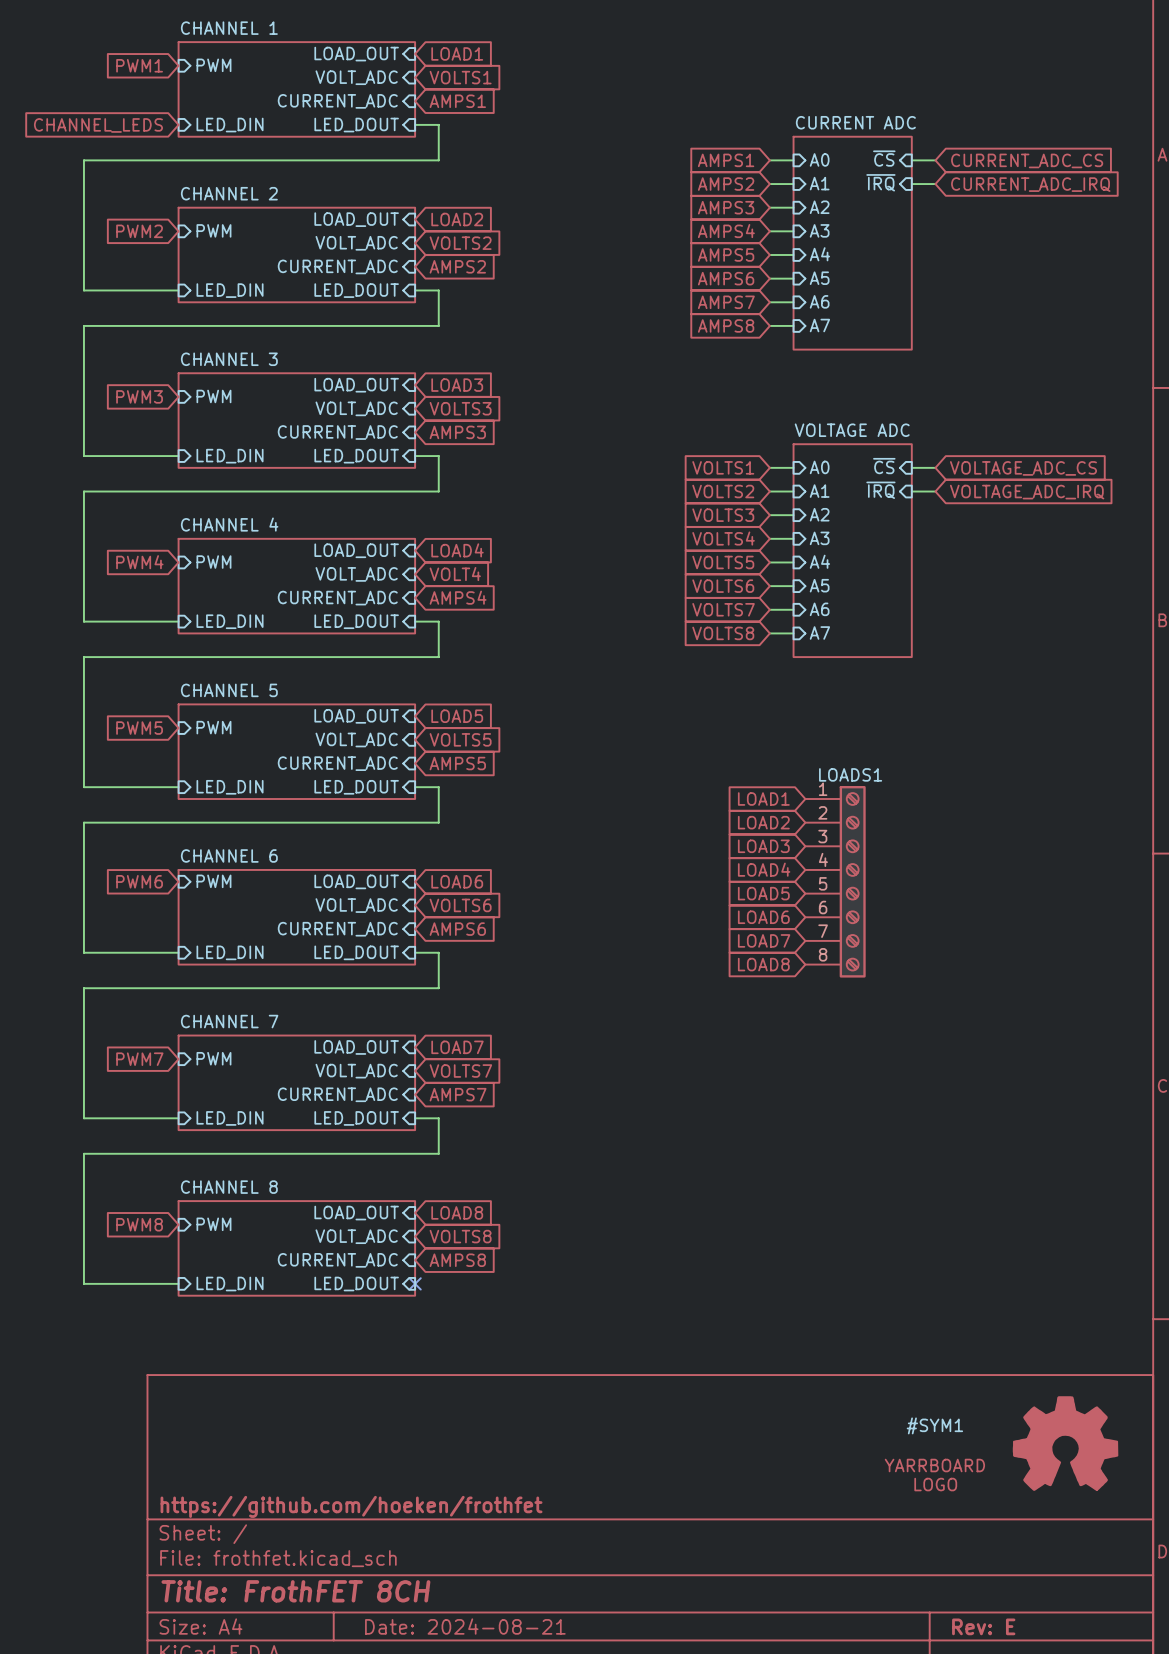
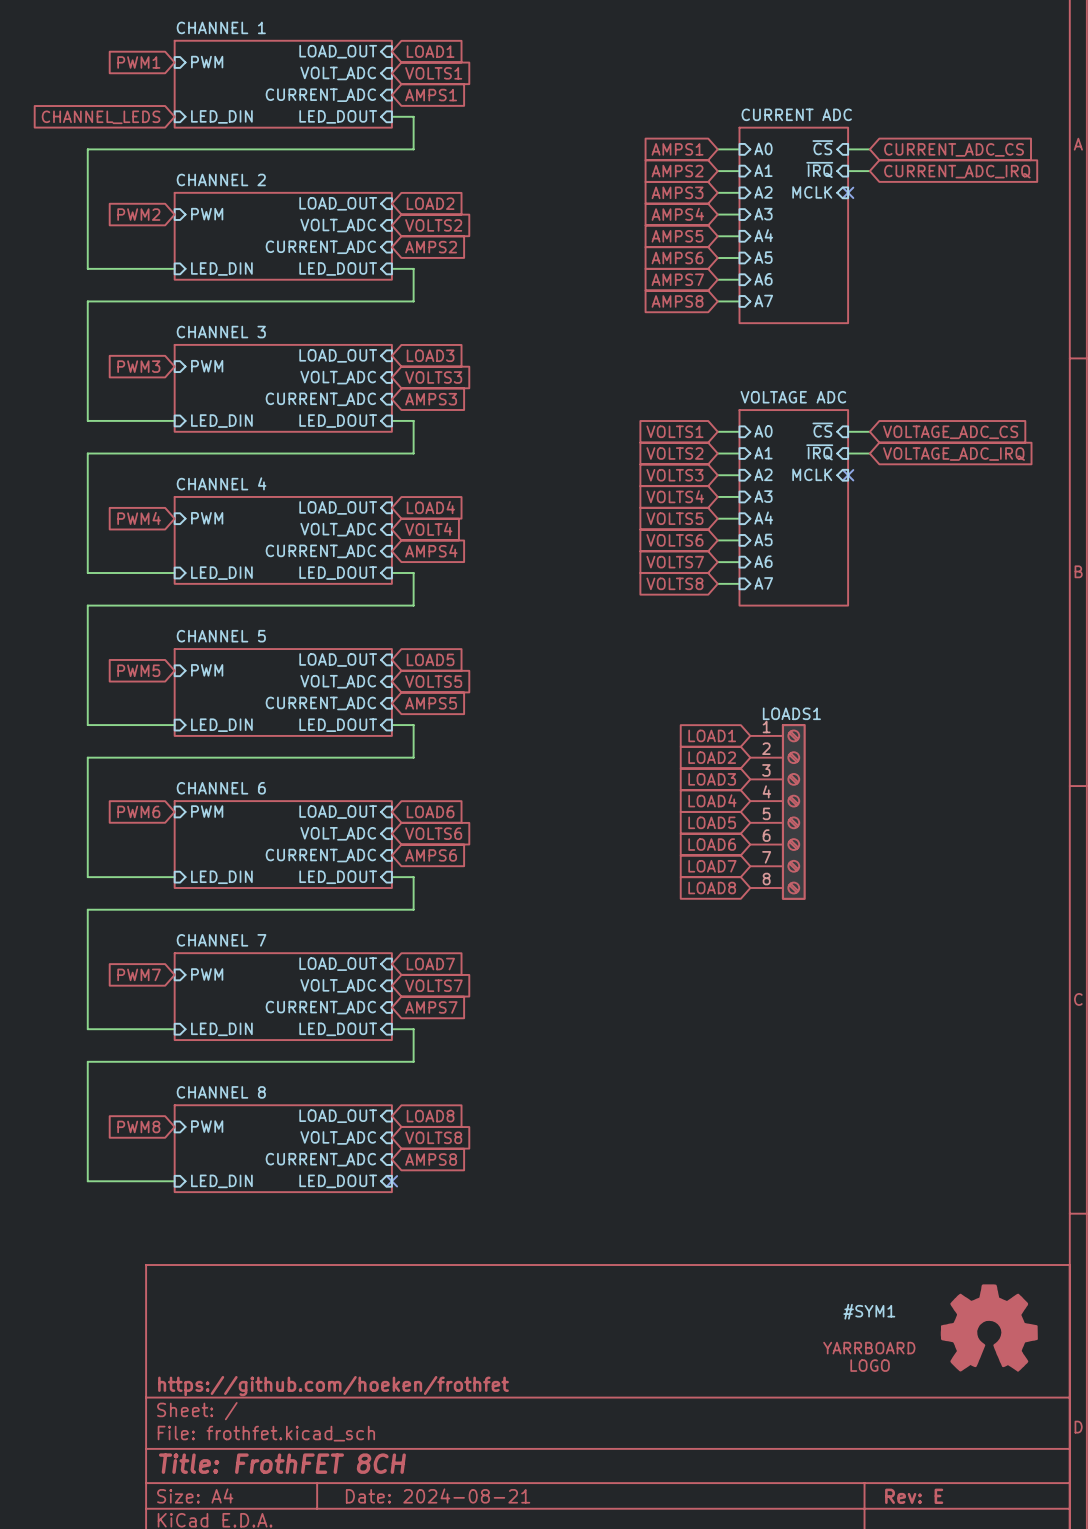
sheet pin: none -> MCLK (812, 192)
no-connect mark: none -> (848, 192)
sheet pin: none -> MCLK (812, 474)
no-connect mark: none -> (848, 475)

